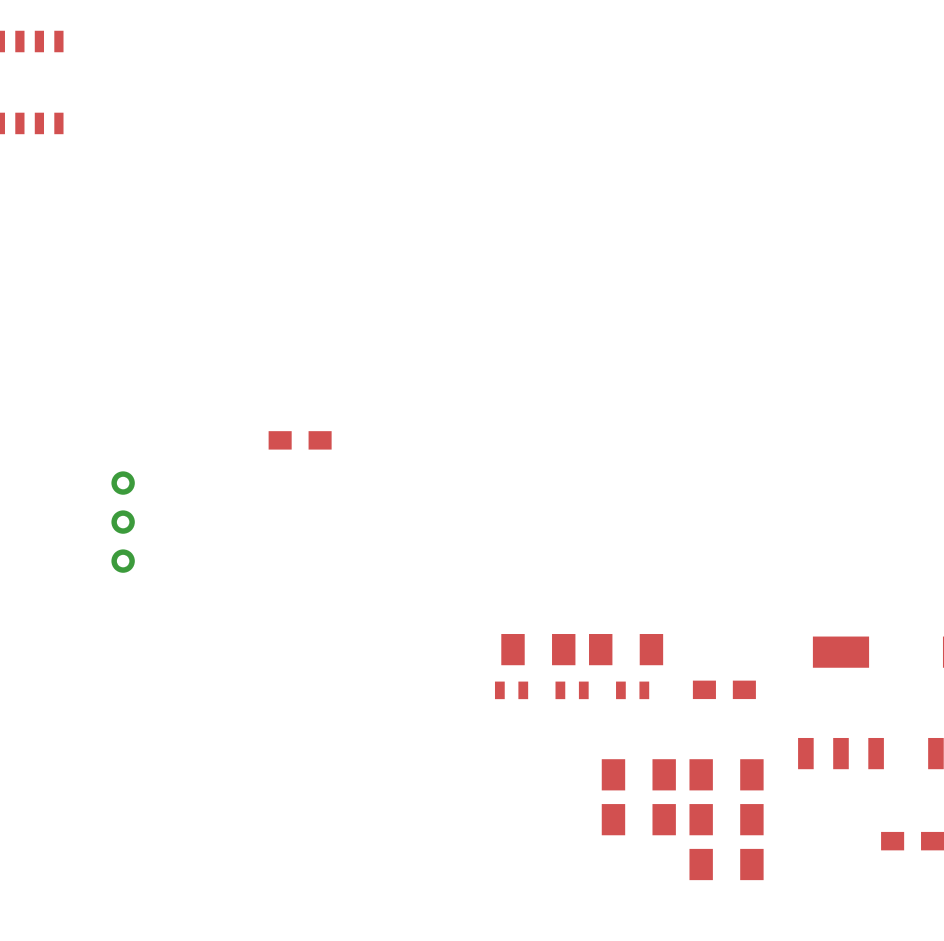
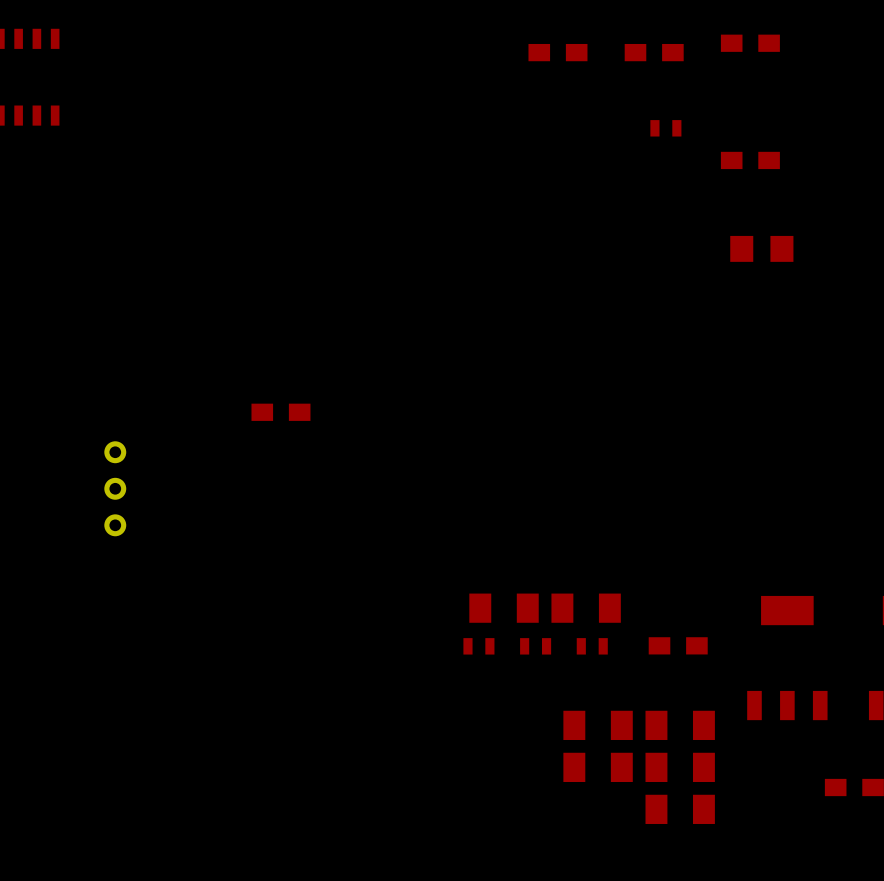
part: none -> (750, 43)
part: none -> (557, 52)
part: none -> (654, 52)
part: none -> (665, 128)
part: none -> (750, 160)
part: none -> (761, 248)

